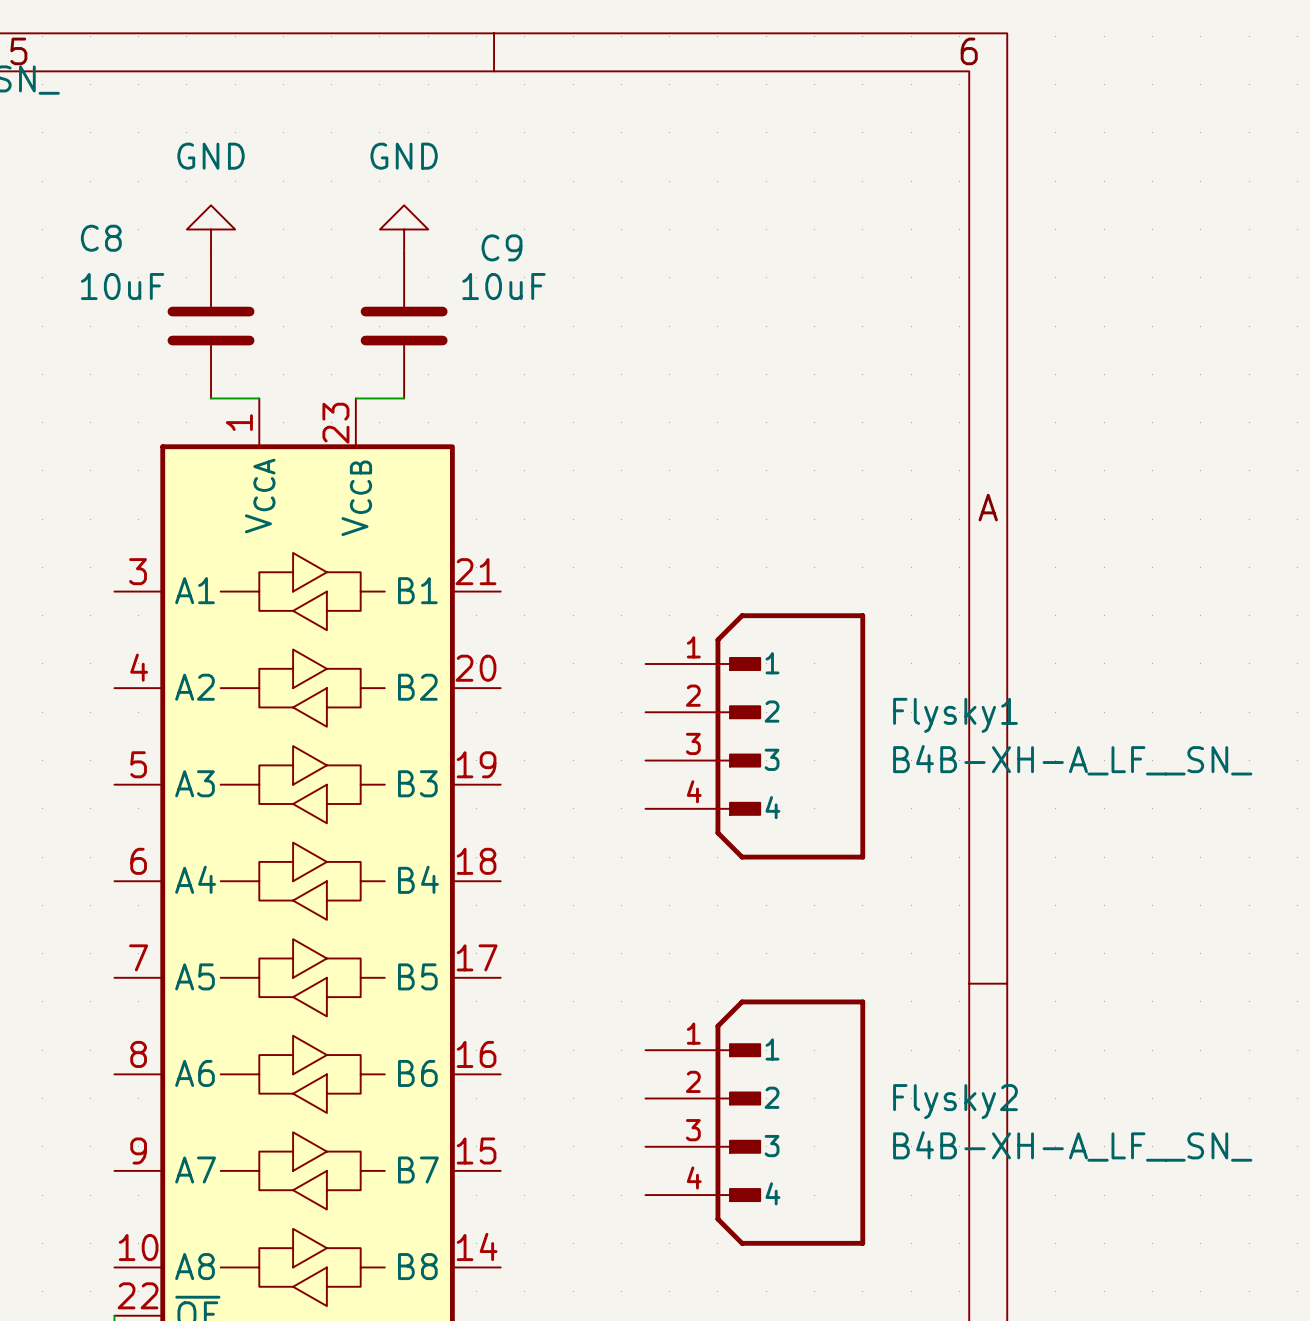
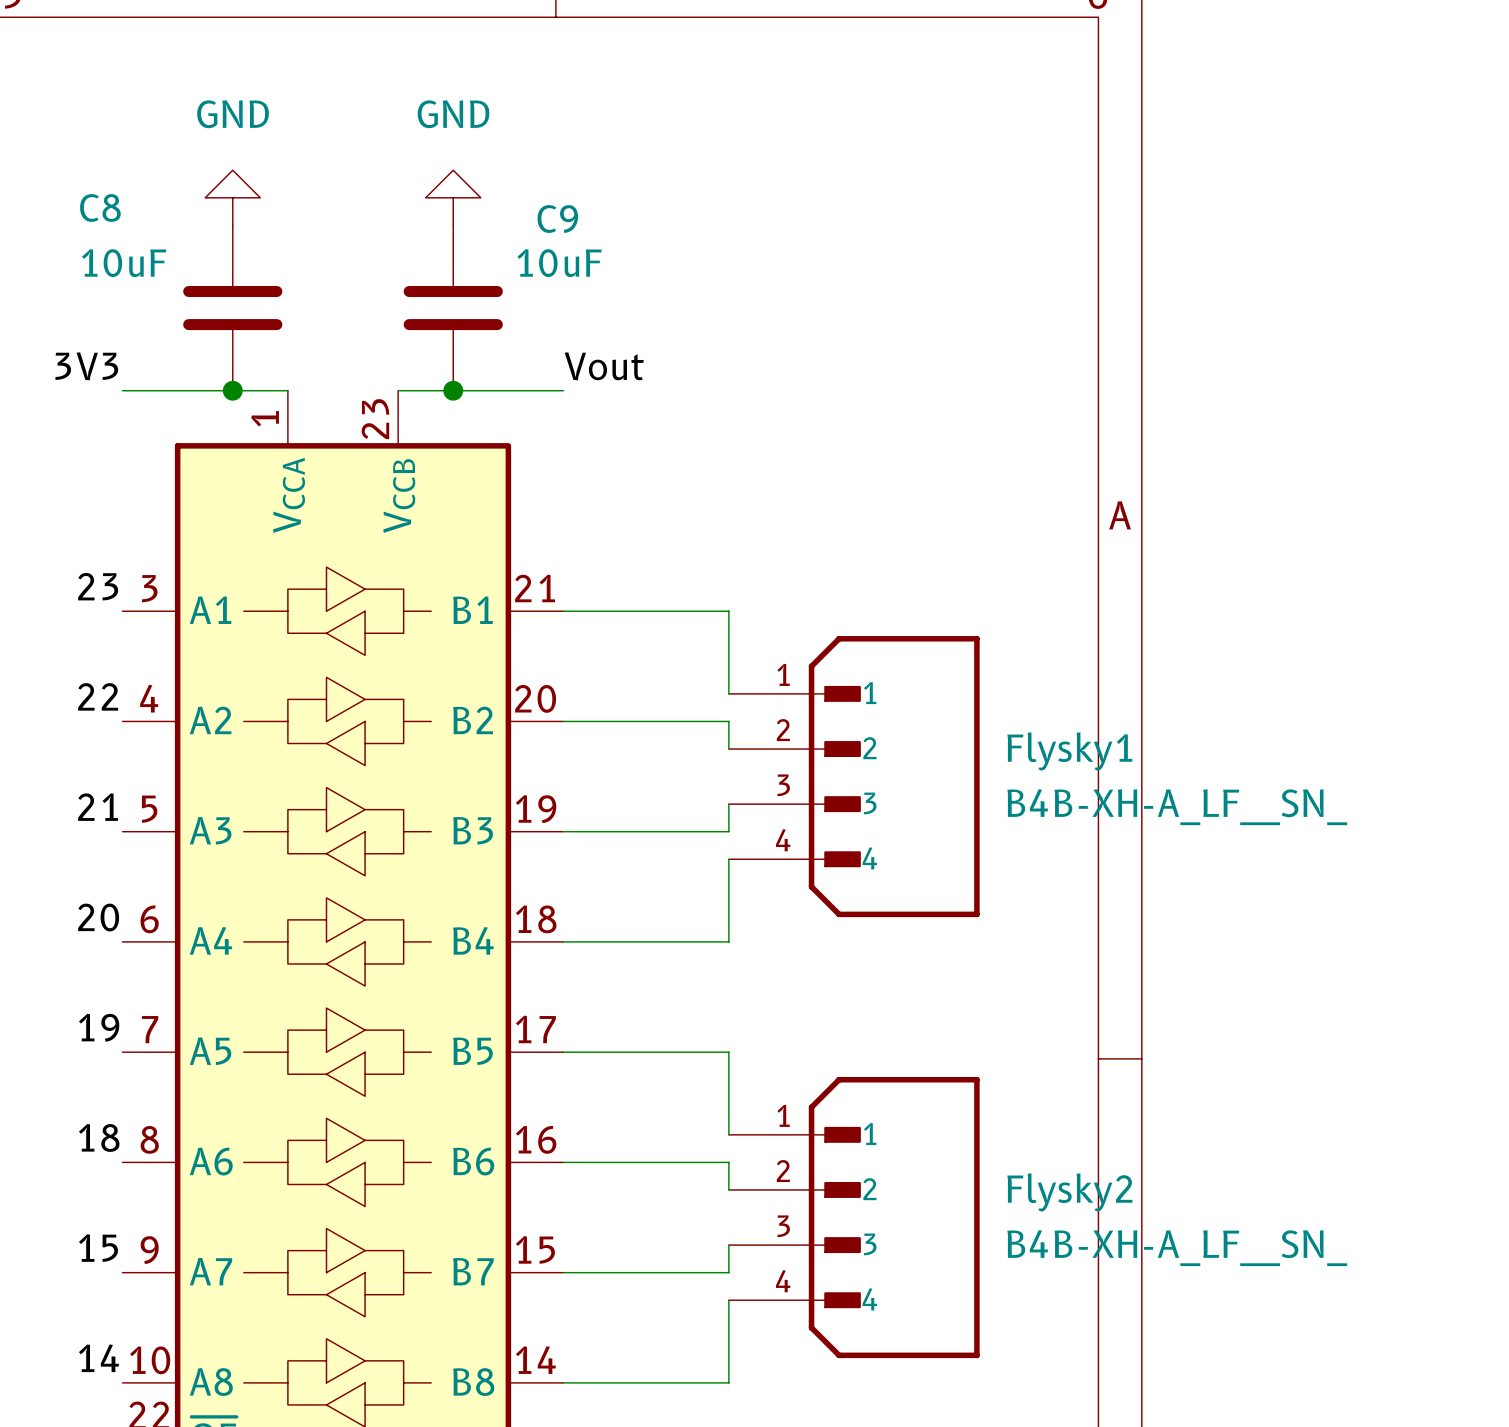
label: none -> 3V3 (86, 366)
label: none -> Vout (604, 366)
wire: none -> (122, 390) (232, 390)
junction: none -> (232, 390)
wire: none -> (453, 390) (563, 390)
junction: none -> (453, 390)
label: none -> 23 (98, 586)
wire: none -> (563, 611) (728, 611) (728, 693)
label: none -> 22 (98, 696)
wire: none -> (563, 721) (728, 721) (728, 749)
wire: none -> (728, 804) (728, 831) (563, 831)
label: none -> 21 (98, 807)
wire: none -> (728, 859) (728, 941) (563, 941)
label: none -> 20 (98, 917)
label: none -> 19 (99, 1027)
wire: none -> (563, 1052) (728, 1052) (728, 1134)
label: none -> 18 (99, 1137)
wire: none -> (563, 1162) (728, 1162) (728, 1189)
wire: none -> (728, 1245) (728, 1272) (563, 1272)
label: none -> 15 (98, 1248)
wire: none -> (728, 1300) (728, 1382) (563, 1382)
label: none -> 14 (98, 1358)

